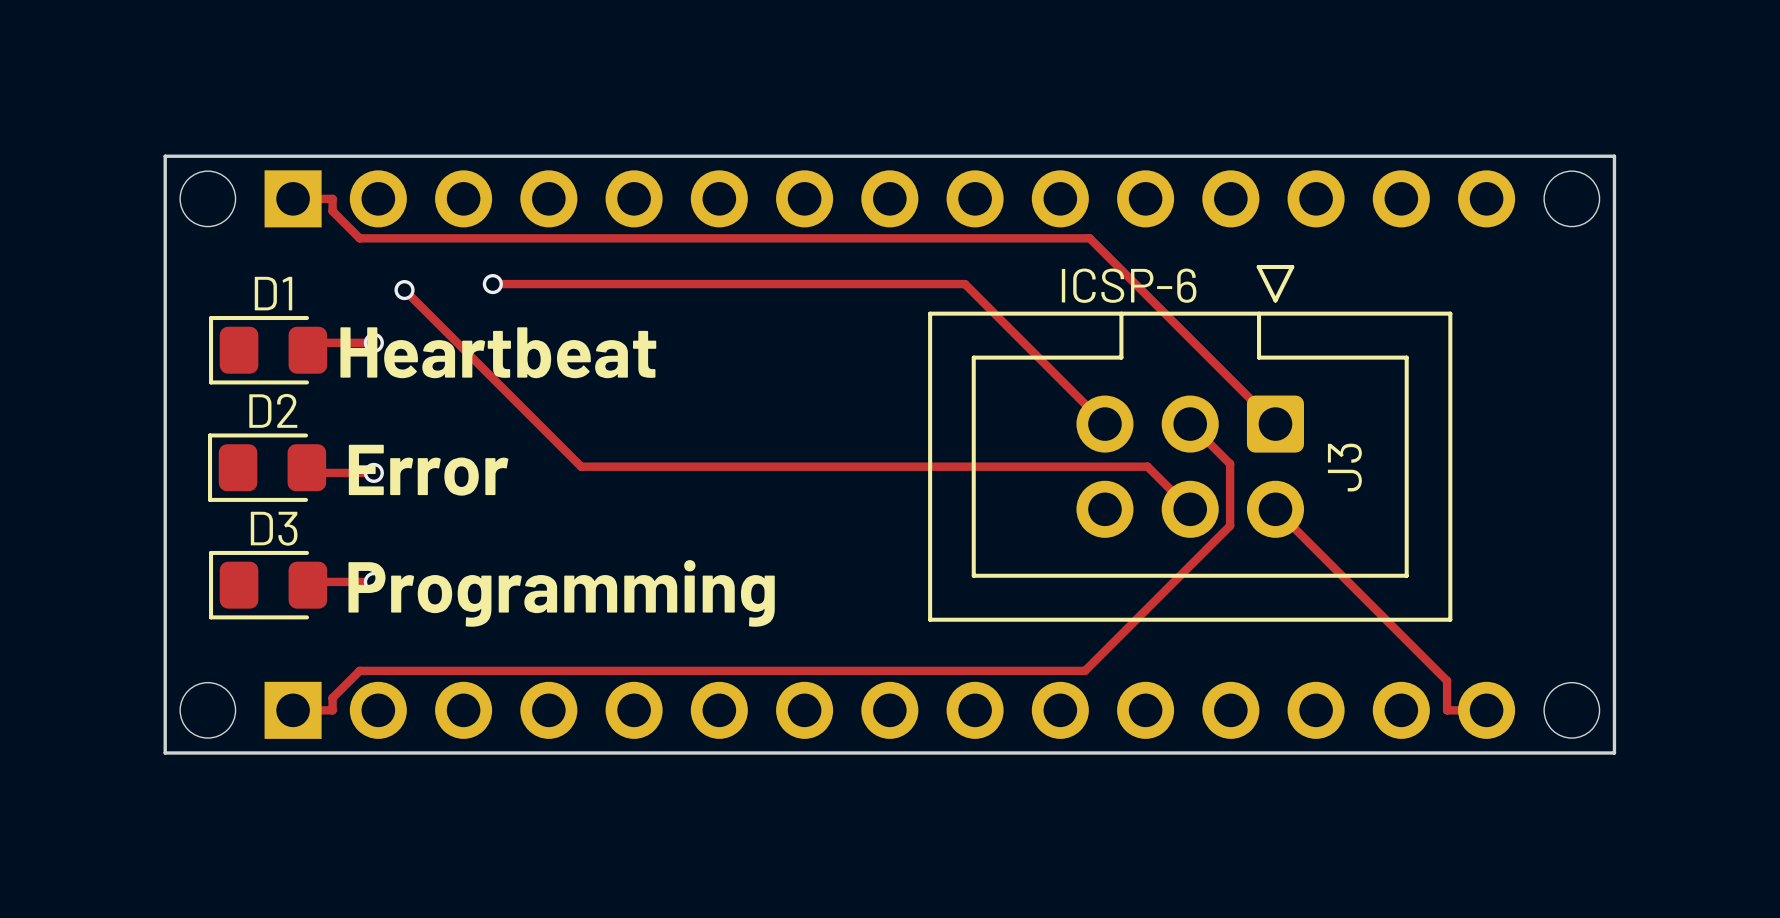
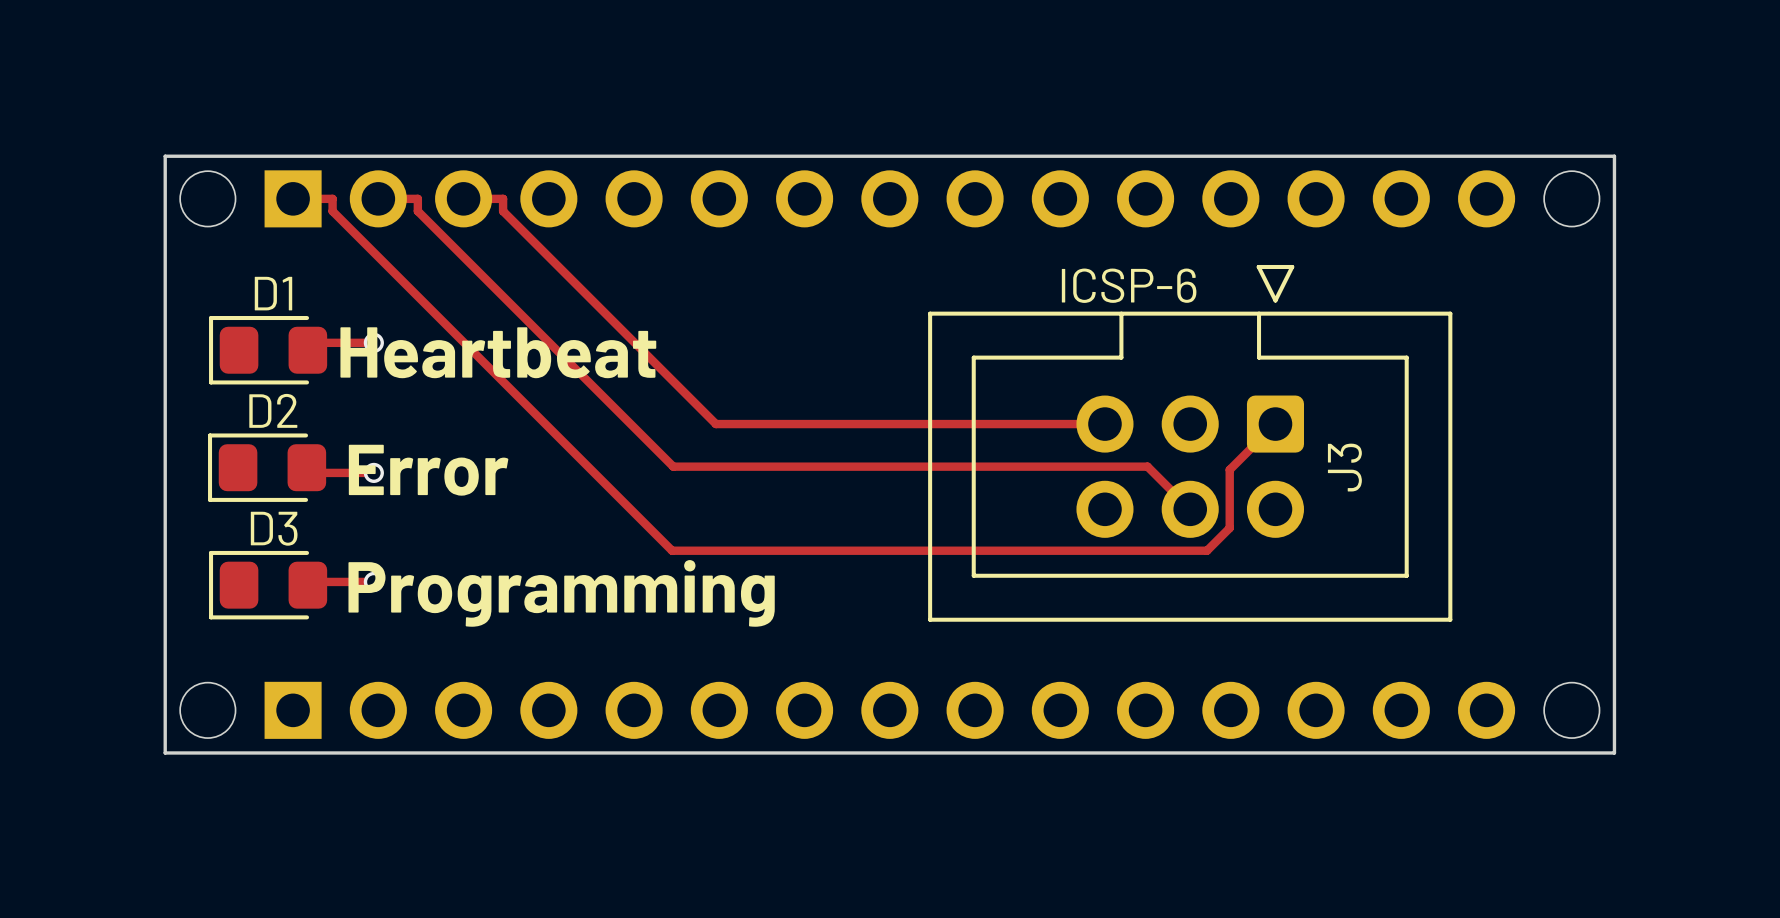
track: (359, 238) (1089, 238) (1275, 424) -> (359, 238) (672, 550) (1207, 550) (1229, 528) (1229, 469) (1275, 424)
track: (492, 284) (964, 284) (1104, 424) -> (463, 198) (503, 198) (503, 211) (715, 424) (1104, 424)
via: (492, 284) -> none
track: (404, 290) (581, 466) (673, 466) -> (378, 198) (417, 198) (417, 211) (673, 466)
via: (404, 290) -> none
track: (1190, 424) (1230, 463) (1230, 525) (1085, 670) (359, 670) (332, 698) (332, 710) (293, 710) -> none
track: (1275, 509) (1447, 680) (1447, 710) (1486, 710) -> none

